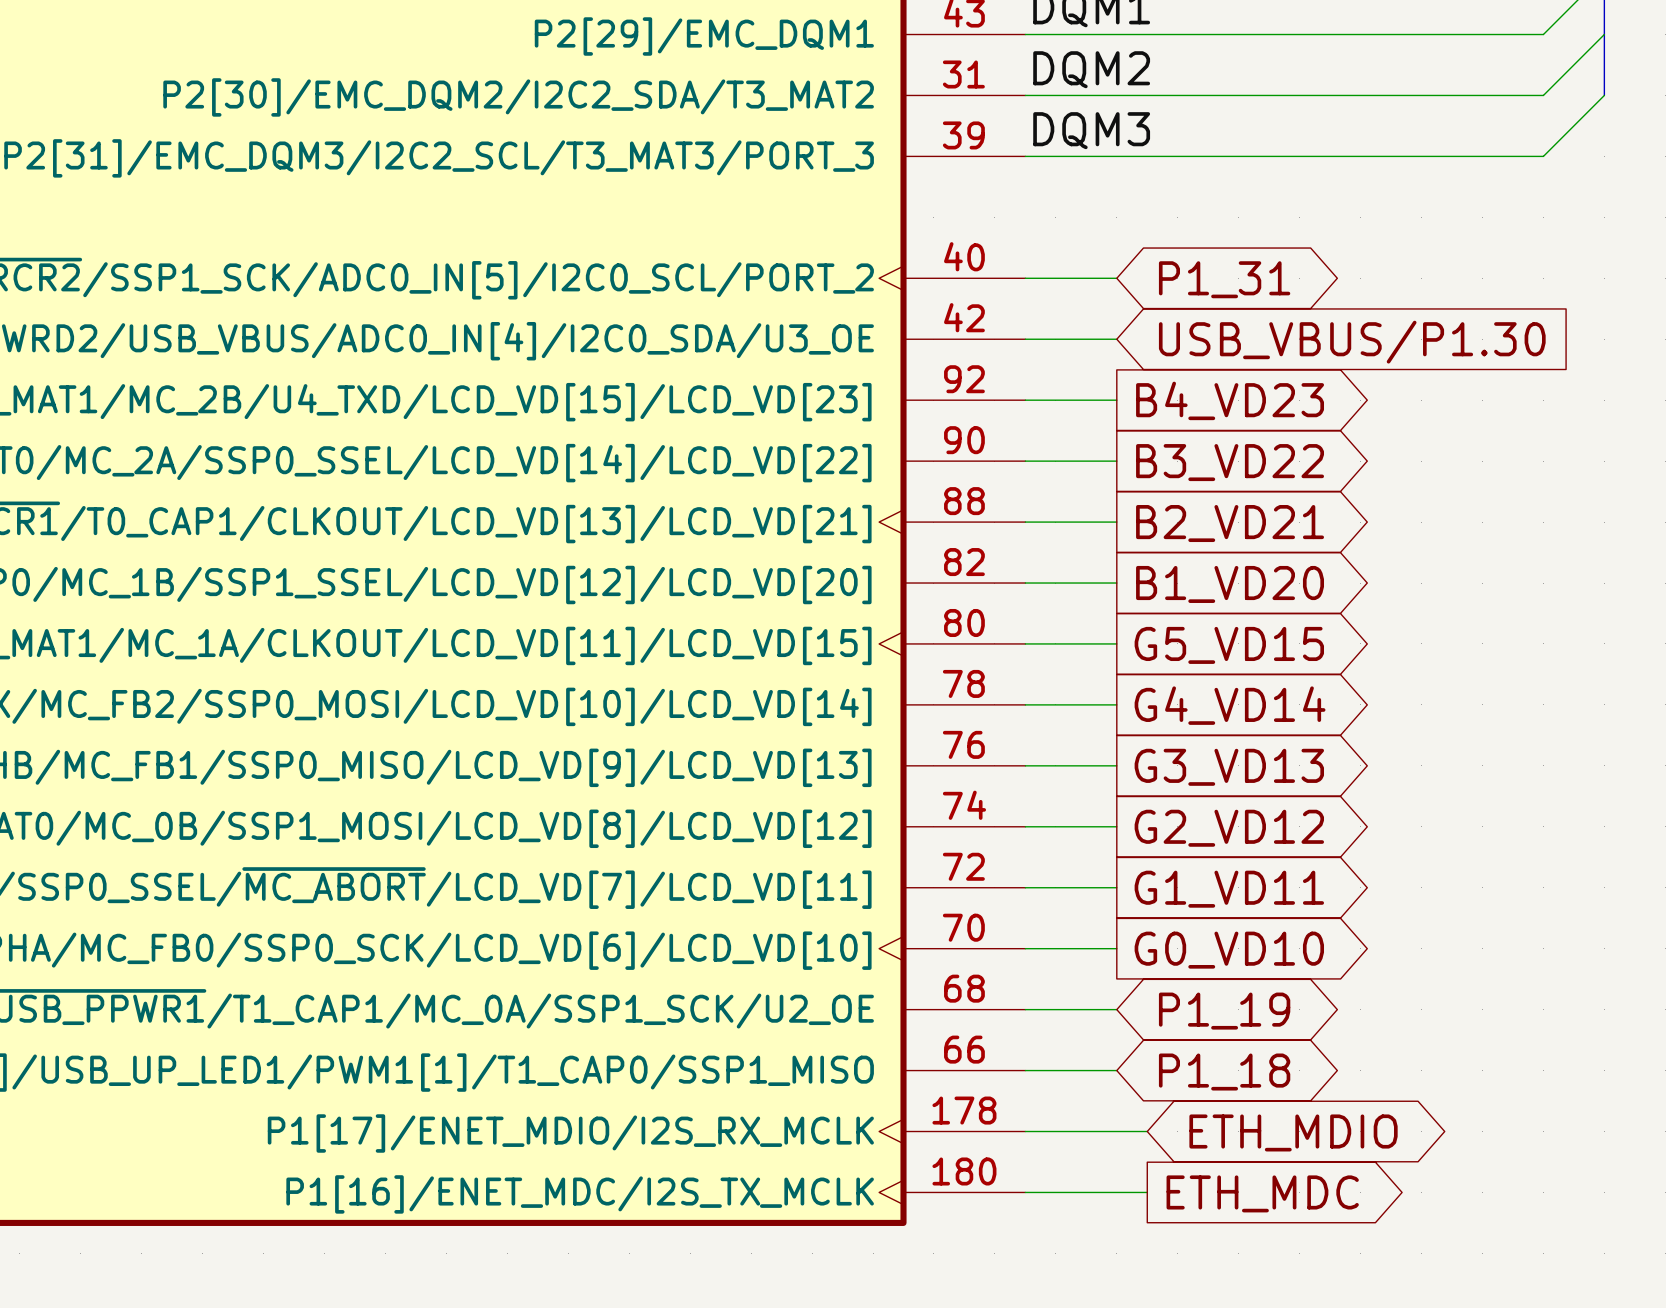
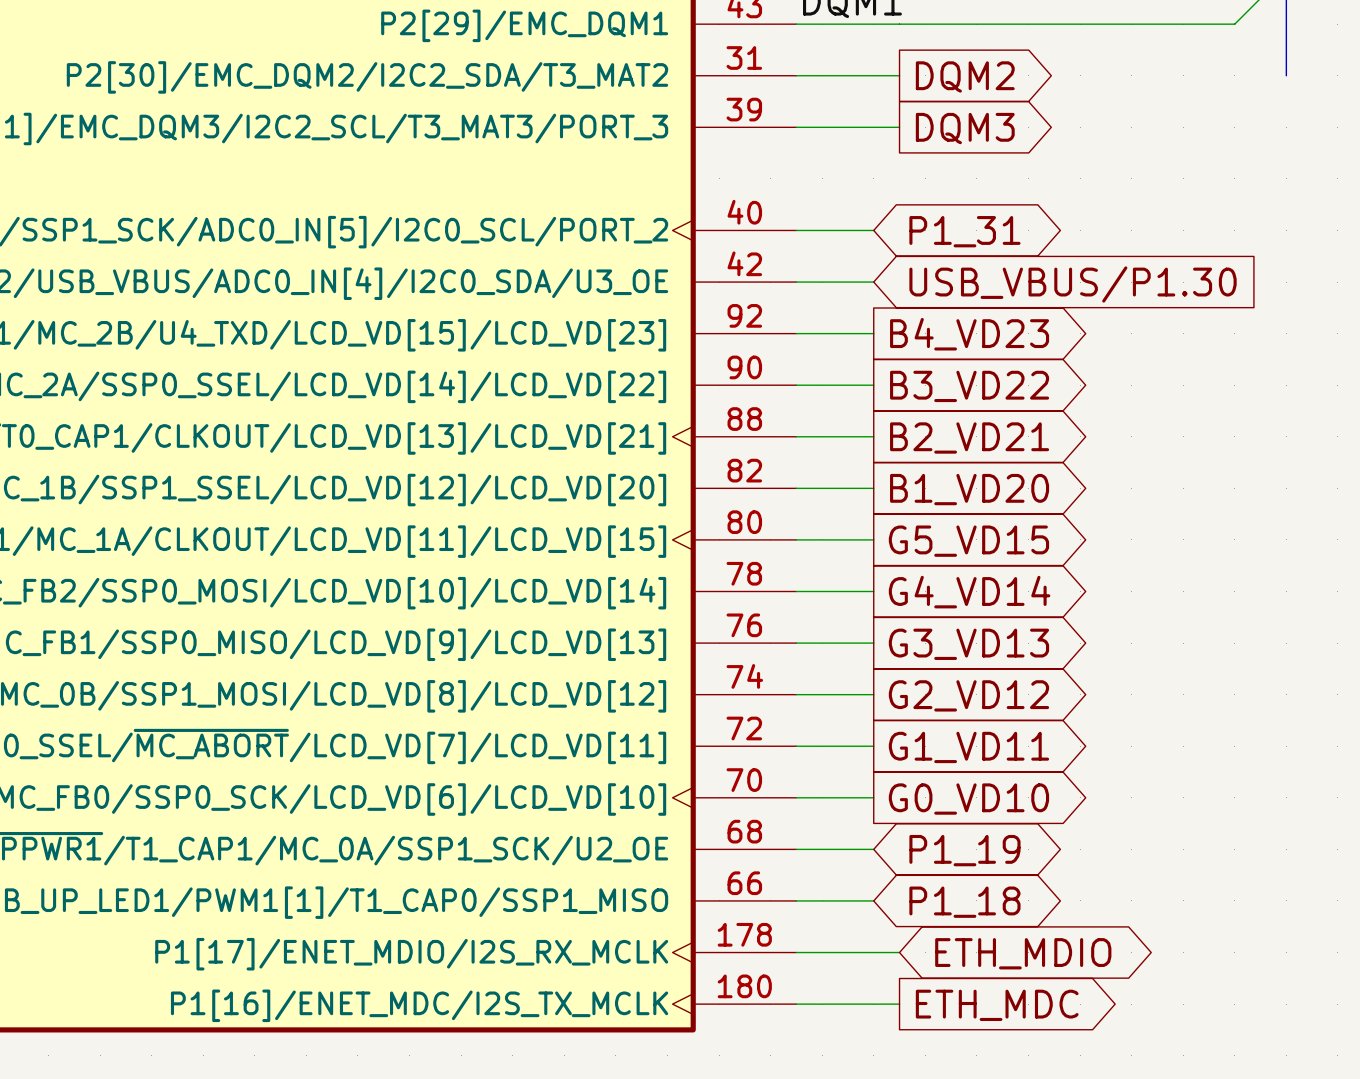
wire: (1604, 34) (1543, 95) (1147, 95) -> none
label: DQM2 (1091, 69) -> none
wire: (1604, 95) (1543, 156) (1147, 156) -> none
global label: none -> DQM2 (965, 76)
label: DQM3 (1091, 130) -> none
global label: none -> DQM3 (965, 128)

